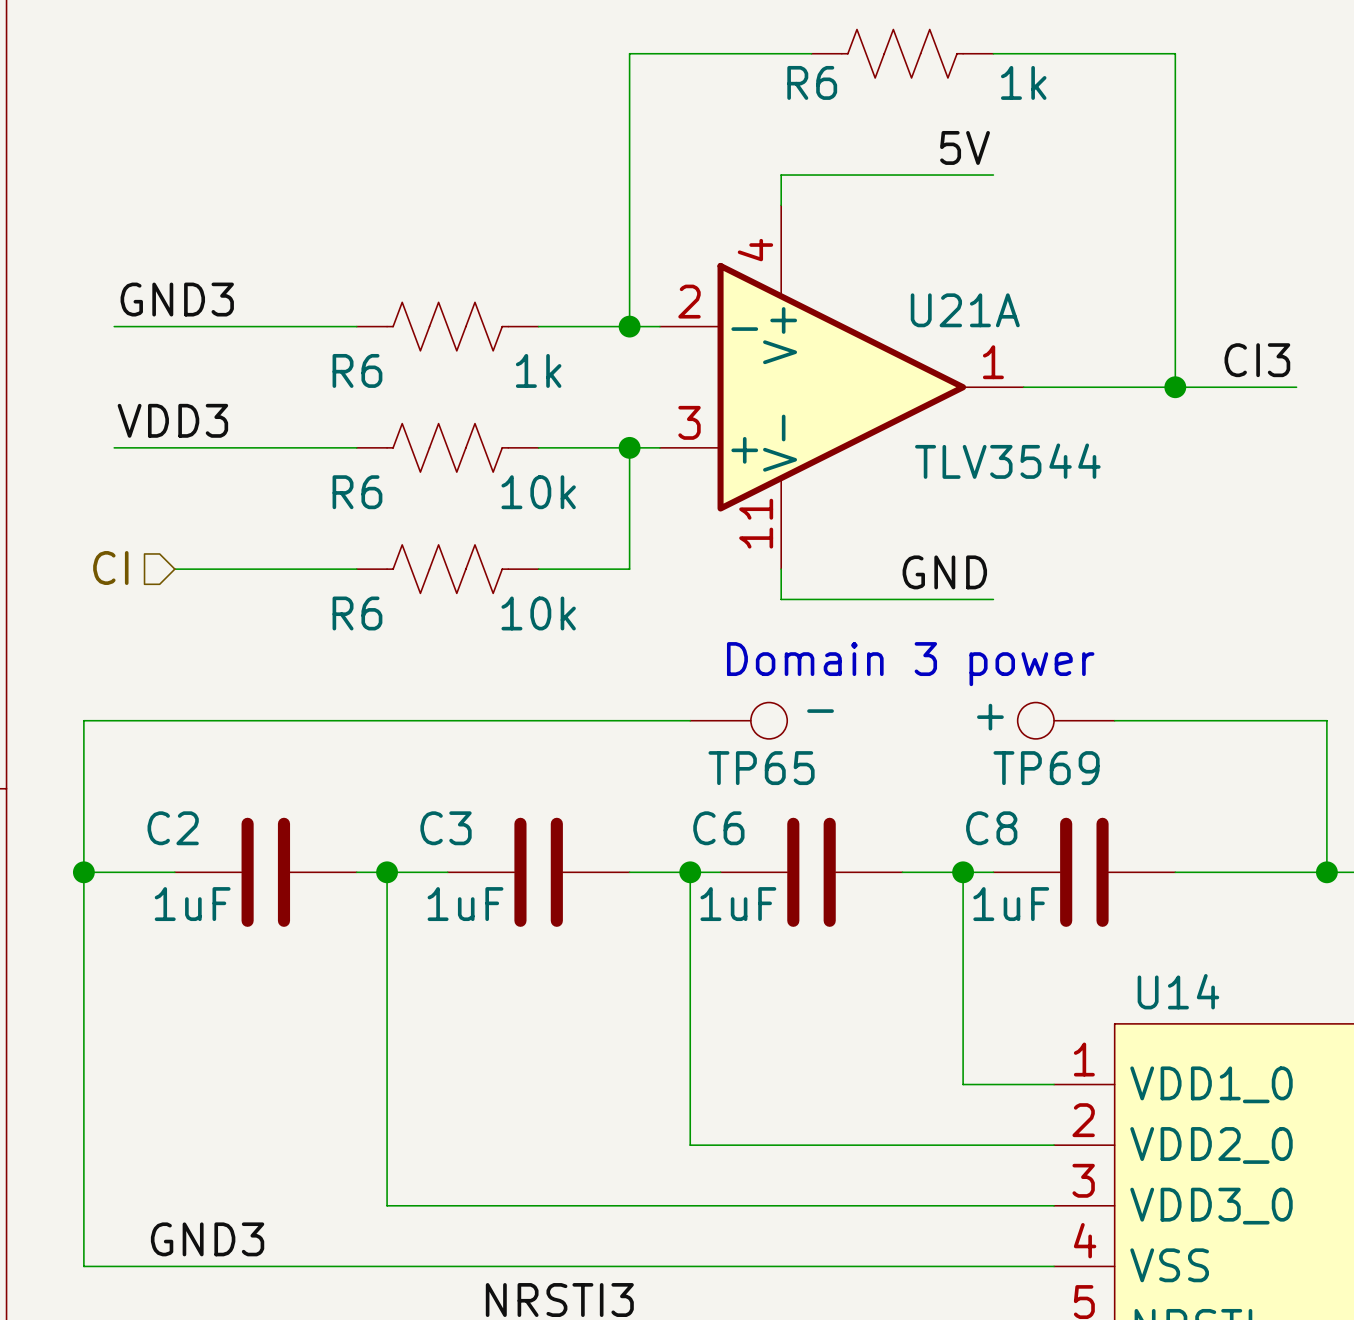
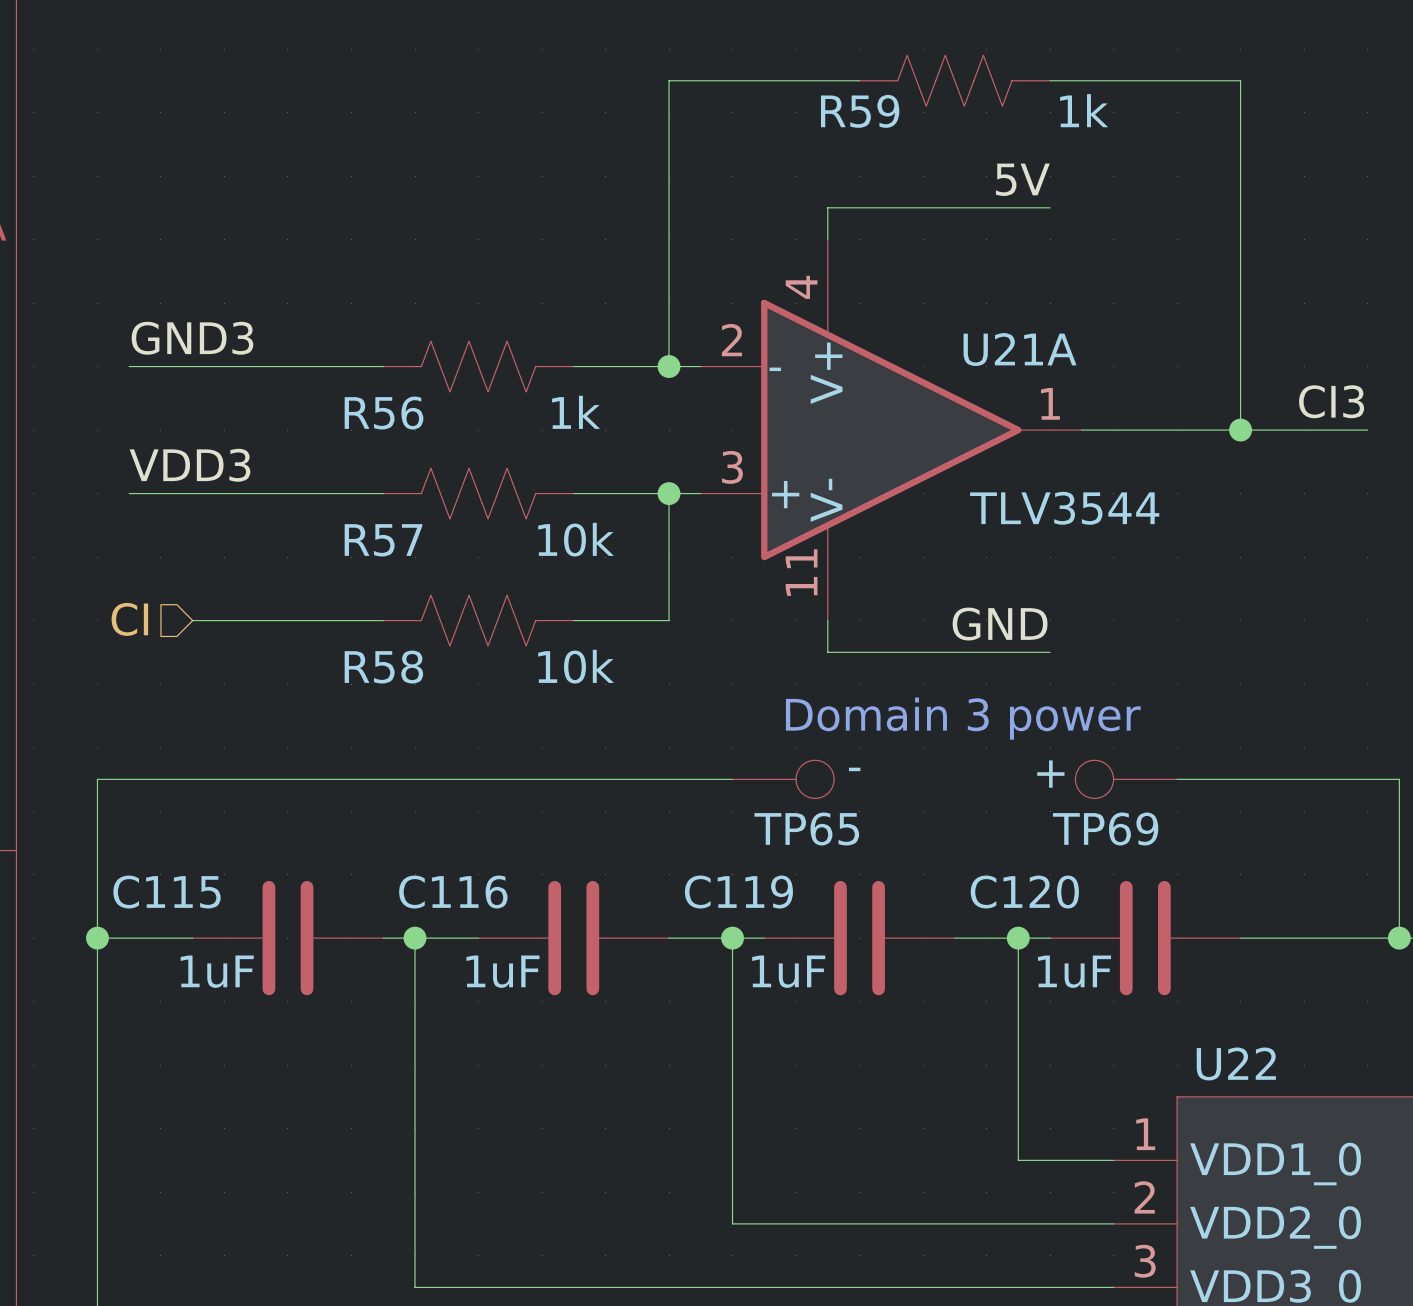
R6 name: R6 (812, 82) -> R59 (860, 111)
R6 name: R6 (357, 370) -> R56 (384, 413)
R6 name: R6 (357, 492) -> R57 (383, 540)
R6 name: R6 (357, 613) -> R58 (383, 667)
C2 name: C2 (173, 828) -> C115 (167, 892)
C3 name: C3 (446, 828) -> C116 (453, 892)
C6 name: C6 (718, 828) -> C119 (738, 892)
C8 name: C8 (991, 828) -> C120 (1024, 892)
U14 name: U14 (1178, 991) -> U22 (1236, 1063)

